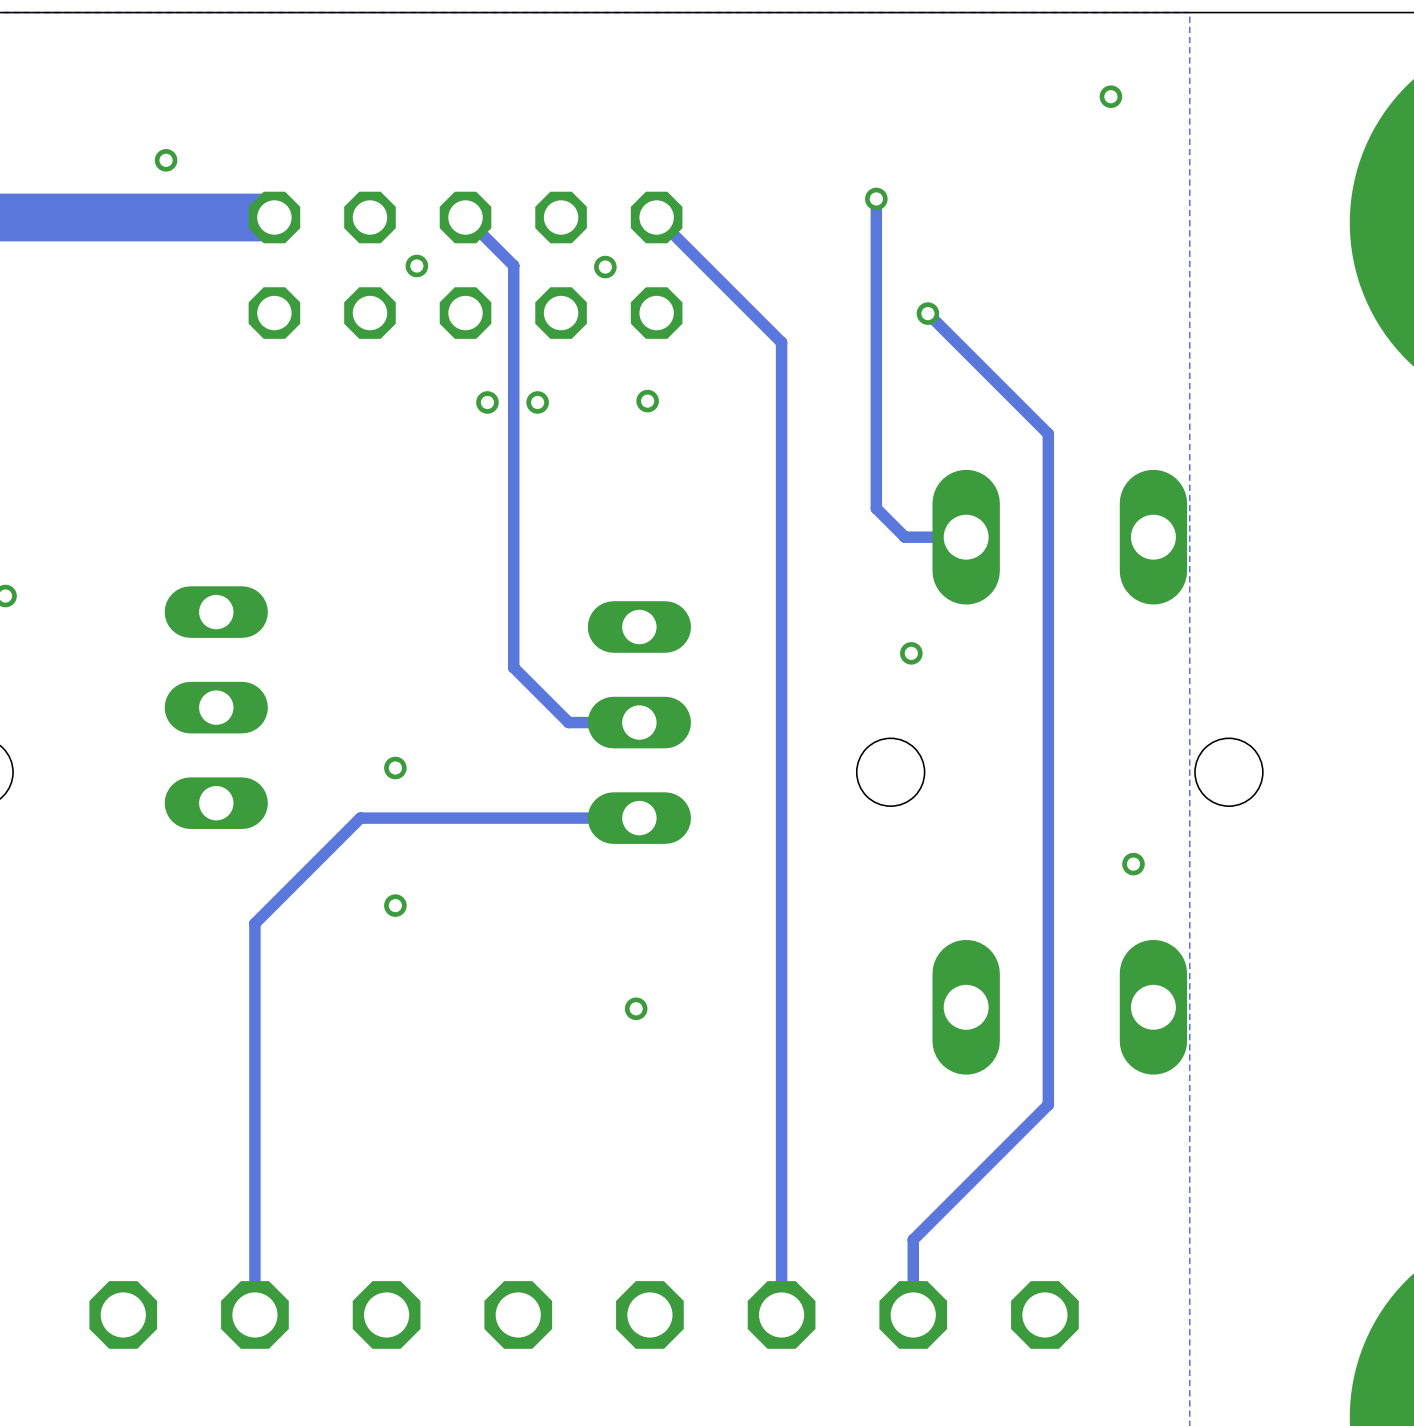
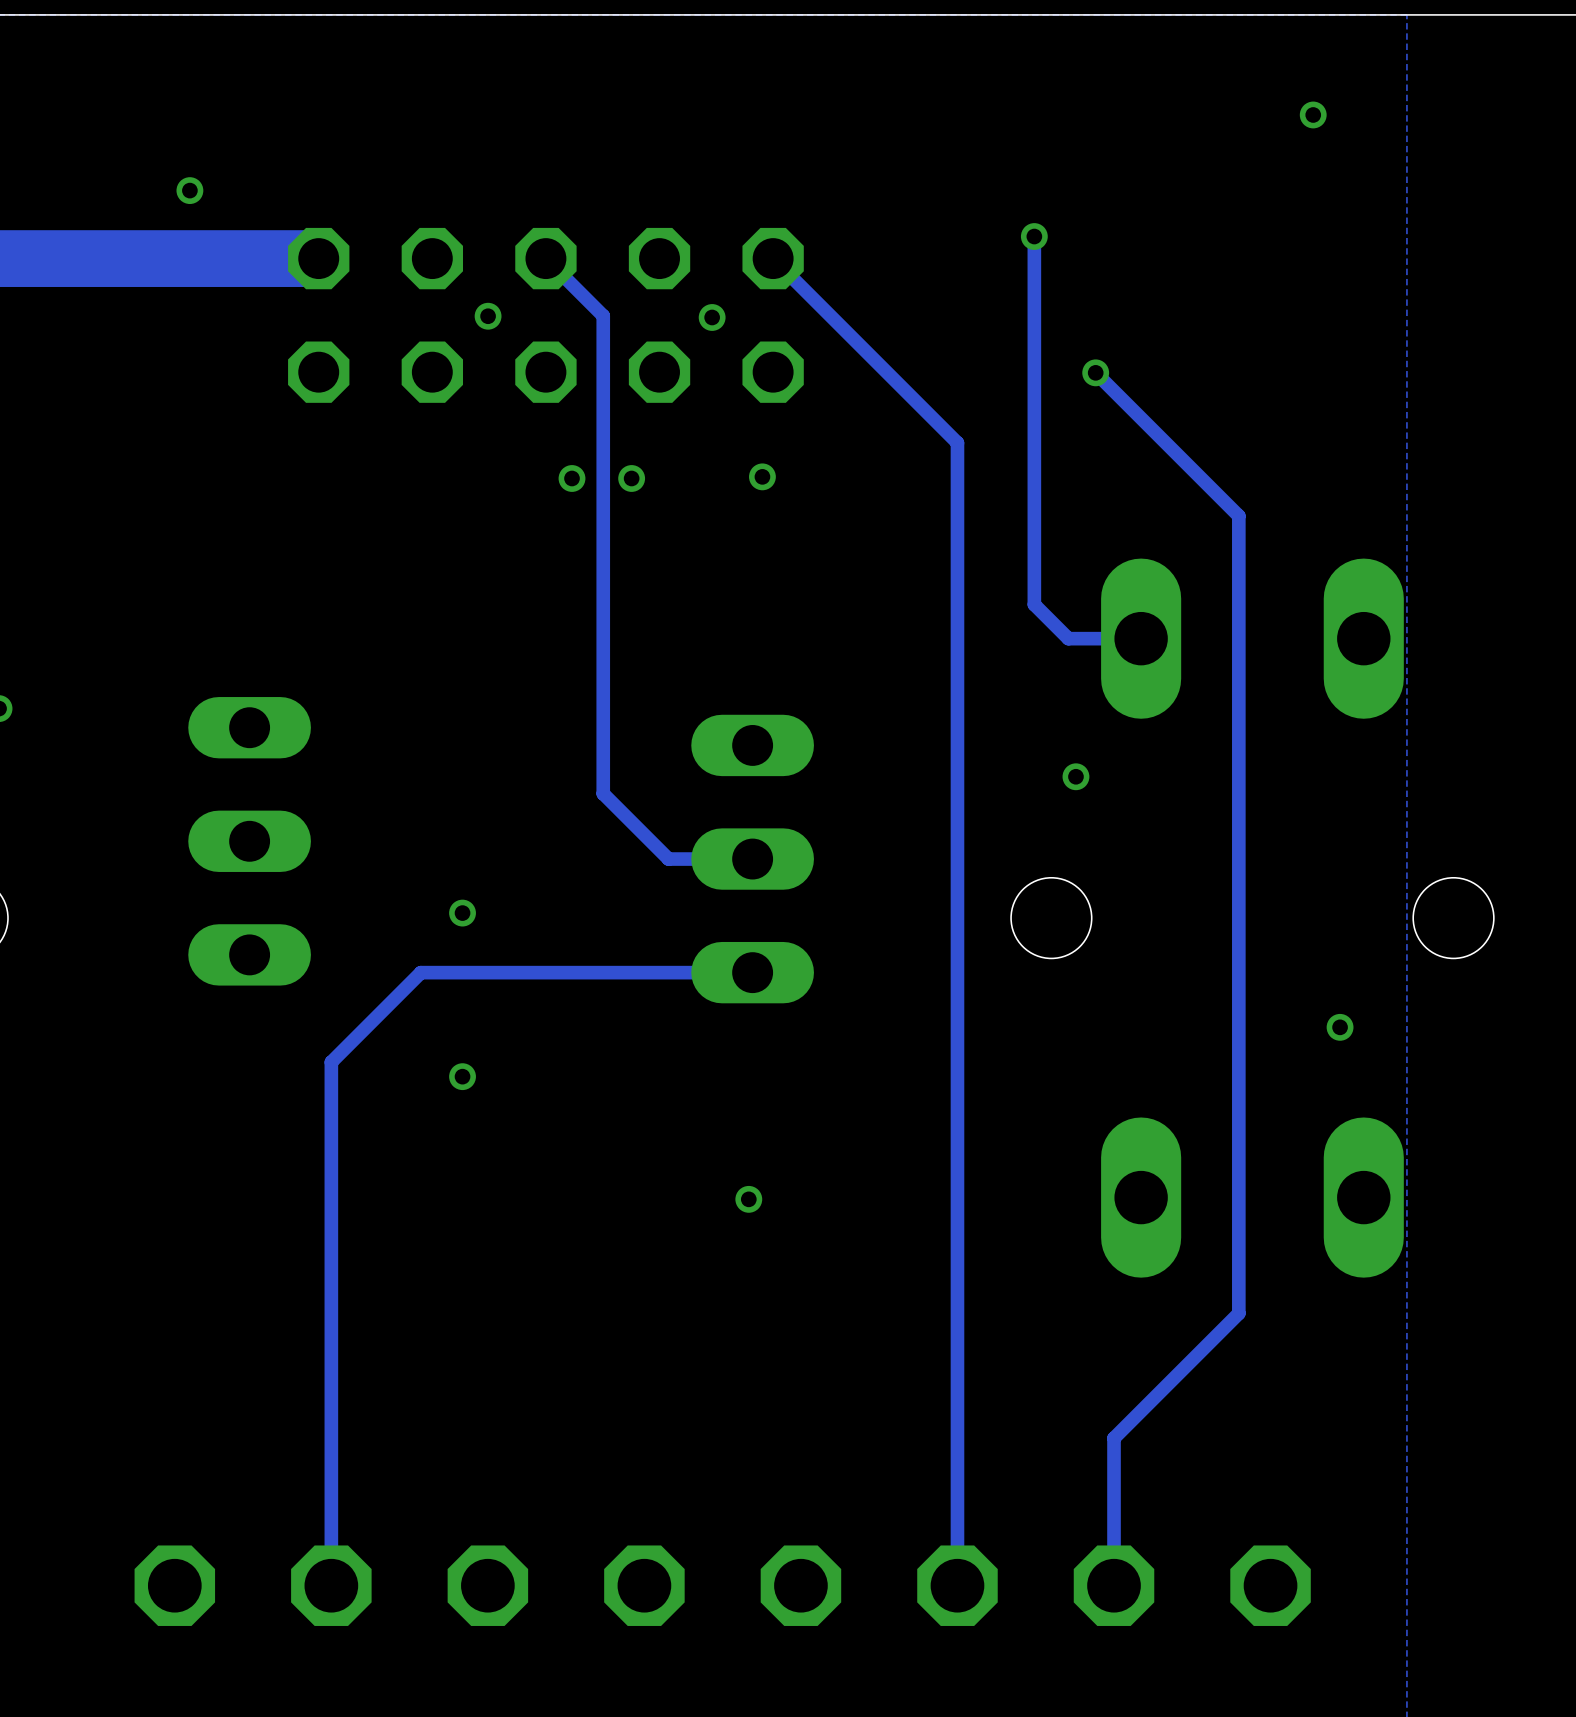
track: (781, 342) (781, 1314) -> (921, 407) (957, 442) (957, 1585)
track: (285, 893) (254, 923) (254, 1314) -> (331, 1062) (331, 1585)
track: (943, 1209) (913, 1239) (913, 1314) -> (1114, 1438) (1114, 1585)
part position: (584, 1314) -> (722, 1585)

